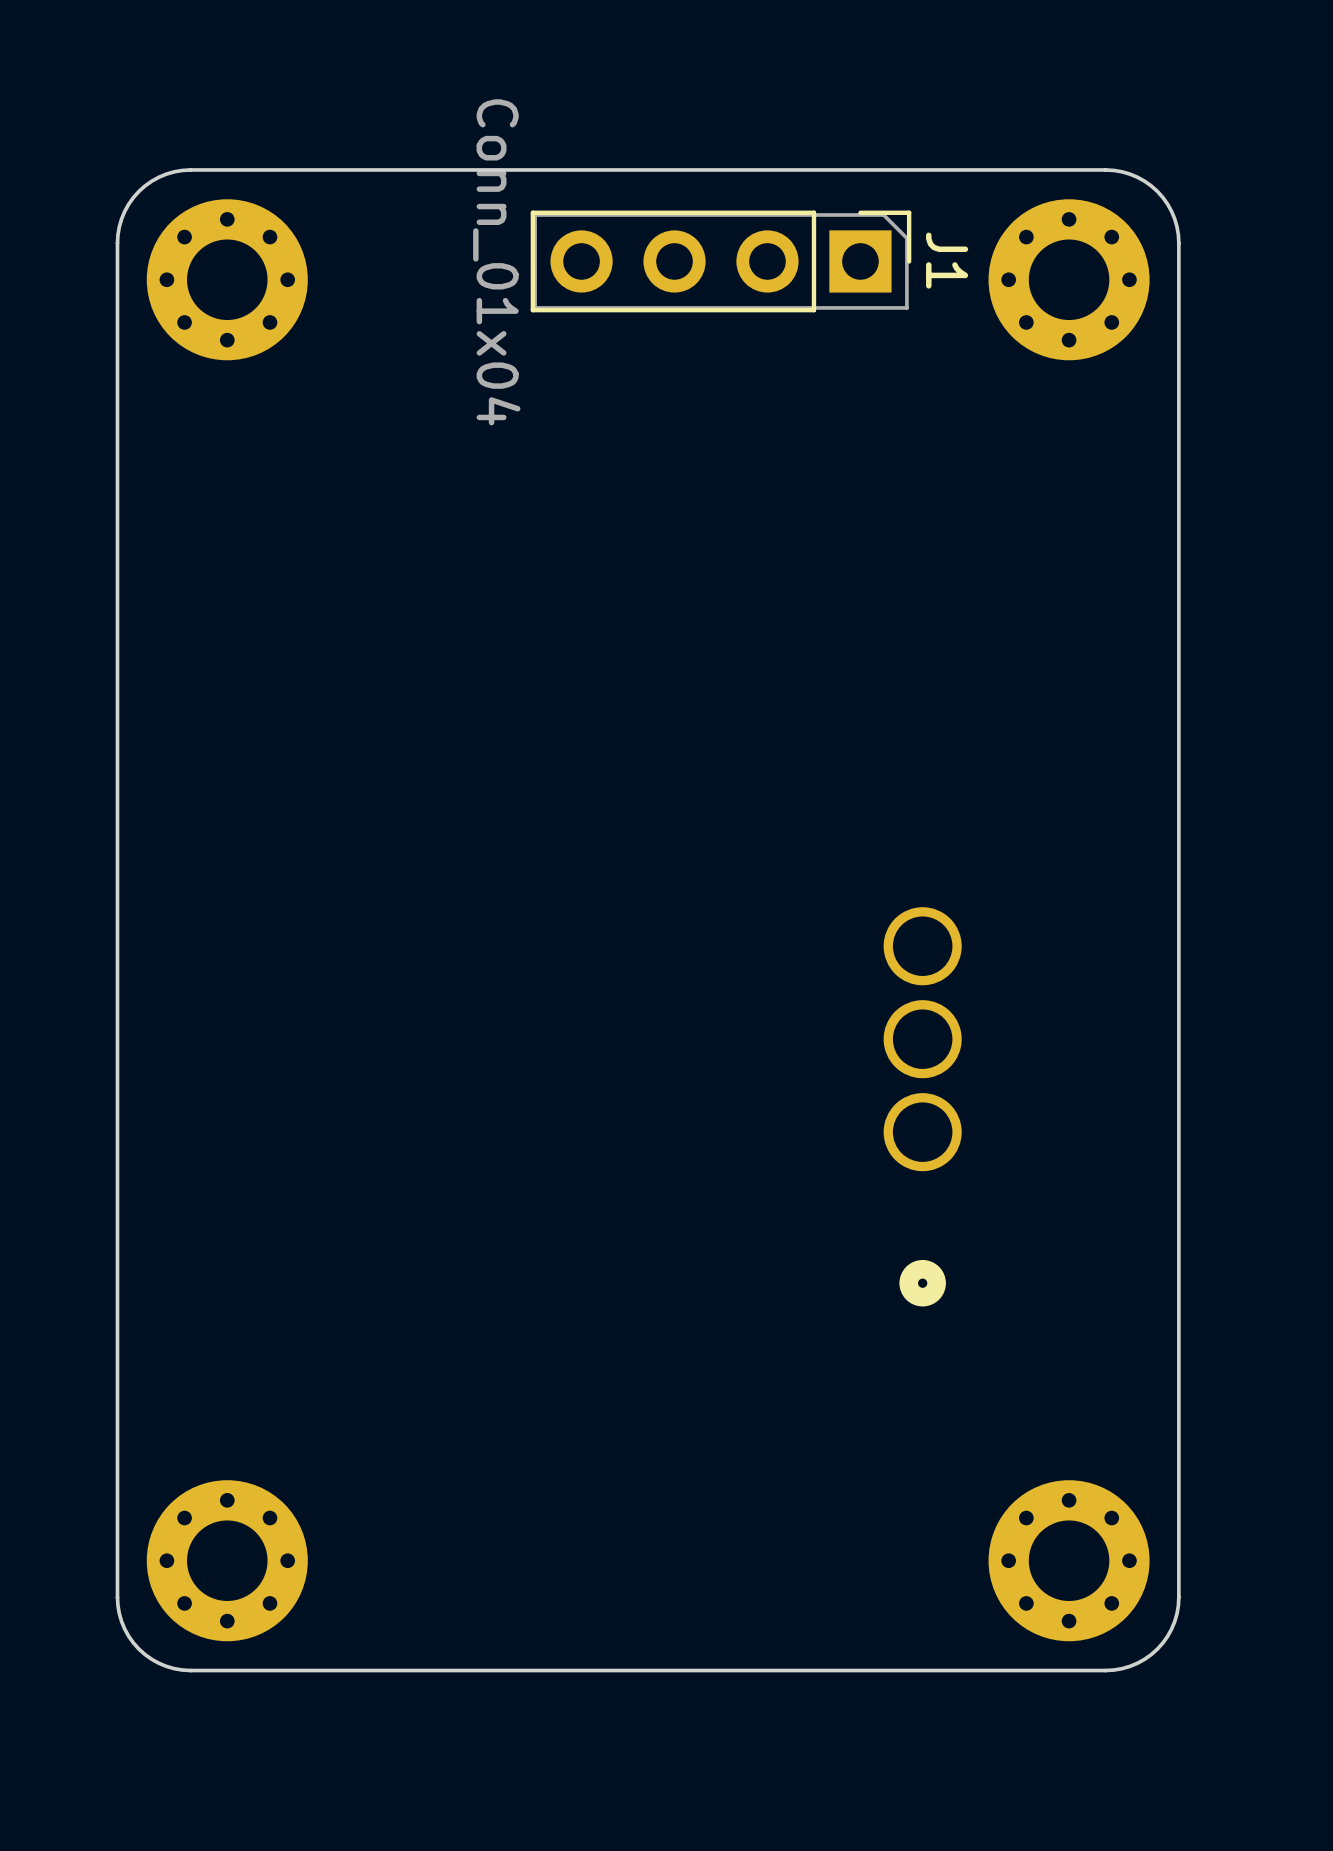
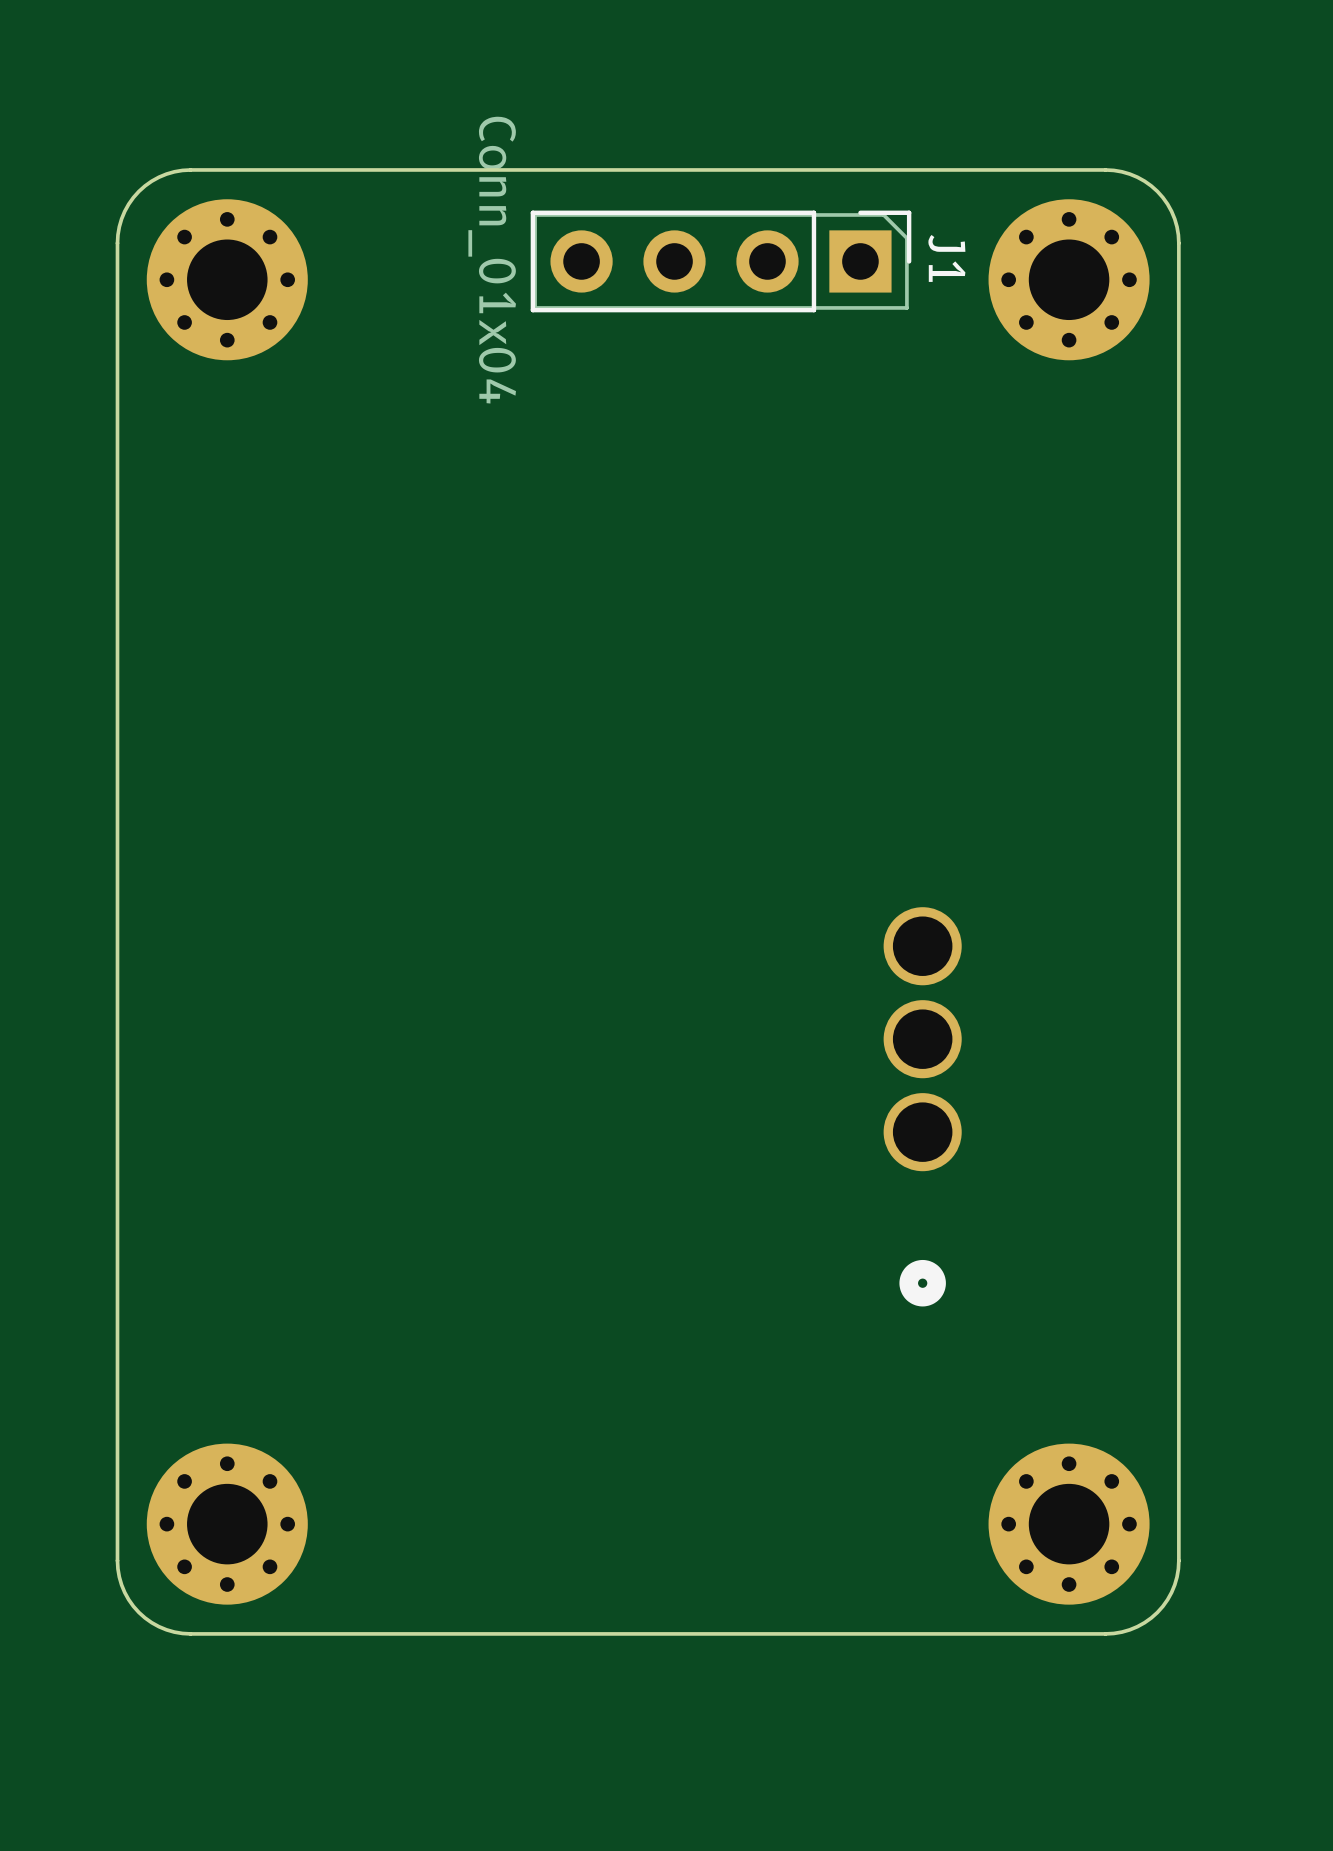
part position: (227, 1560) -> (227, 1524)
part position: (1069, 1560) -> (1069, 1524)
board edge: (1178, 1560) (1178, 1605) (1174, 1621) (1167, 1636) (1151, 1654) (1137, 1663) (1121, 1668) (1105, 1670) (182, 1670) (166, 1666) (151, 1659) (138, 1649) (128, 1636) (121, 1621) (117, 1605) (117, 1560) -> (1178, 1560) (1177, 1577) (1171, 1592) (1157, 1612) (1137, 1626) (1121, 1632) (1105, 1633) (182, 1633) (166, 1629) (151, 1622) (133, 1606) (121, 1584) (117, 1560)

